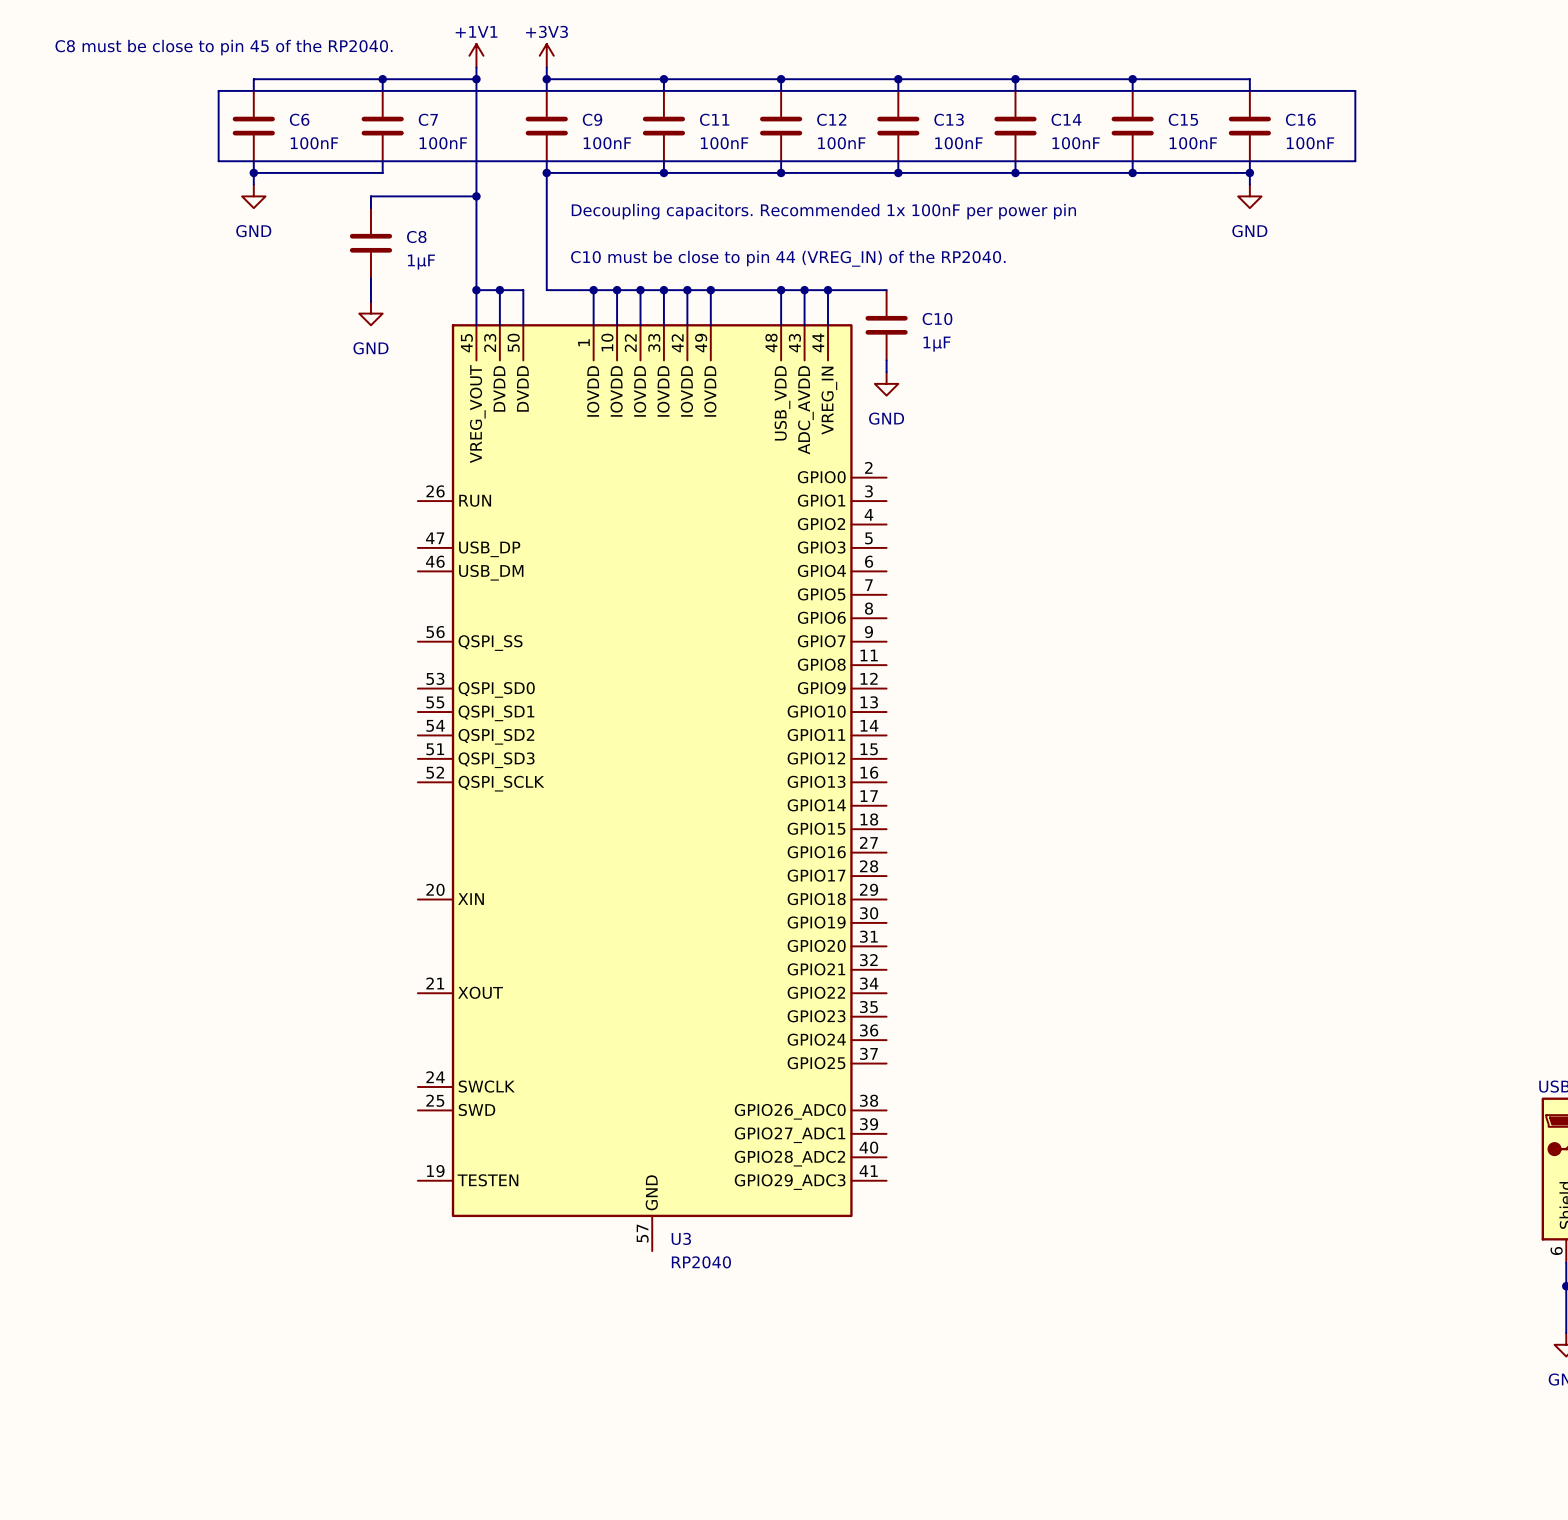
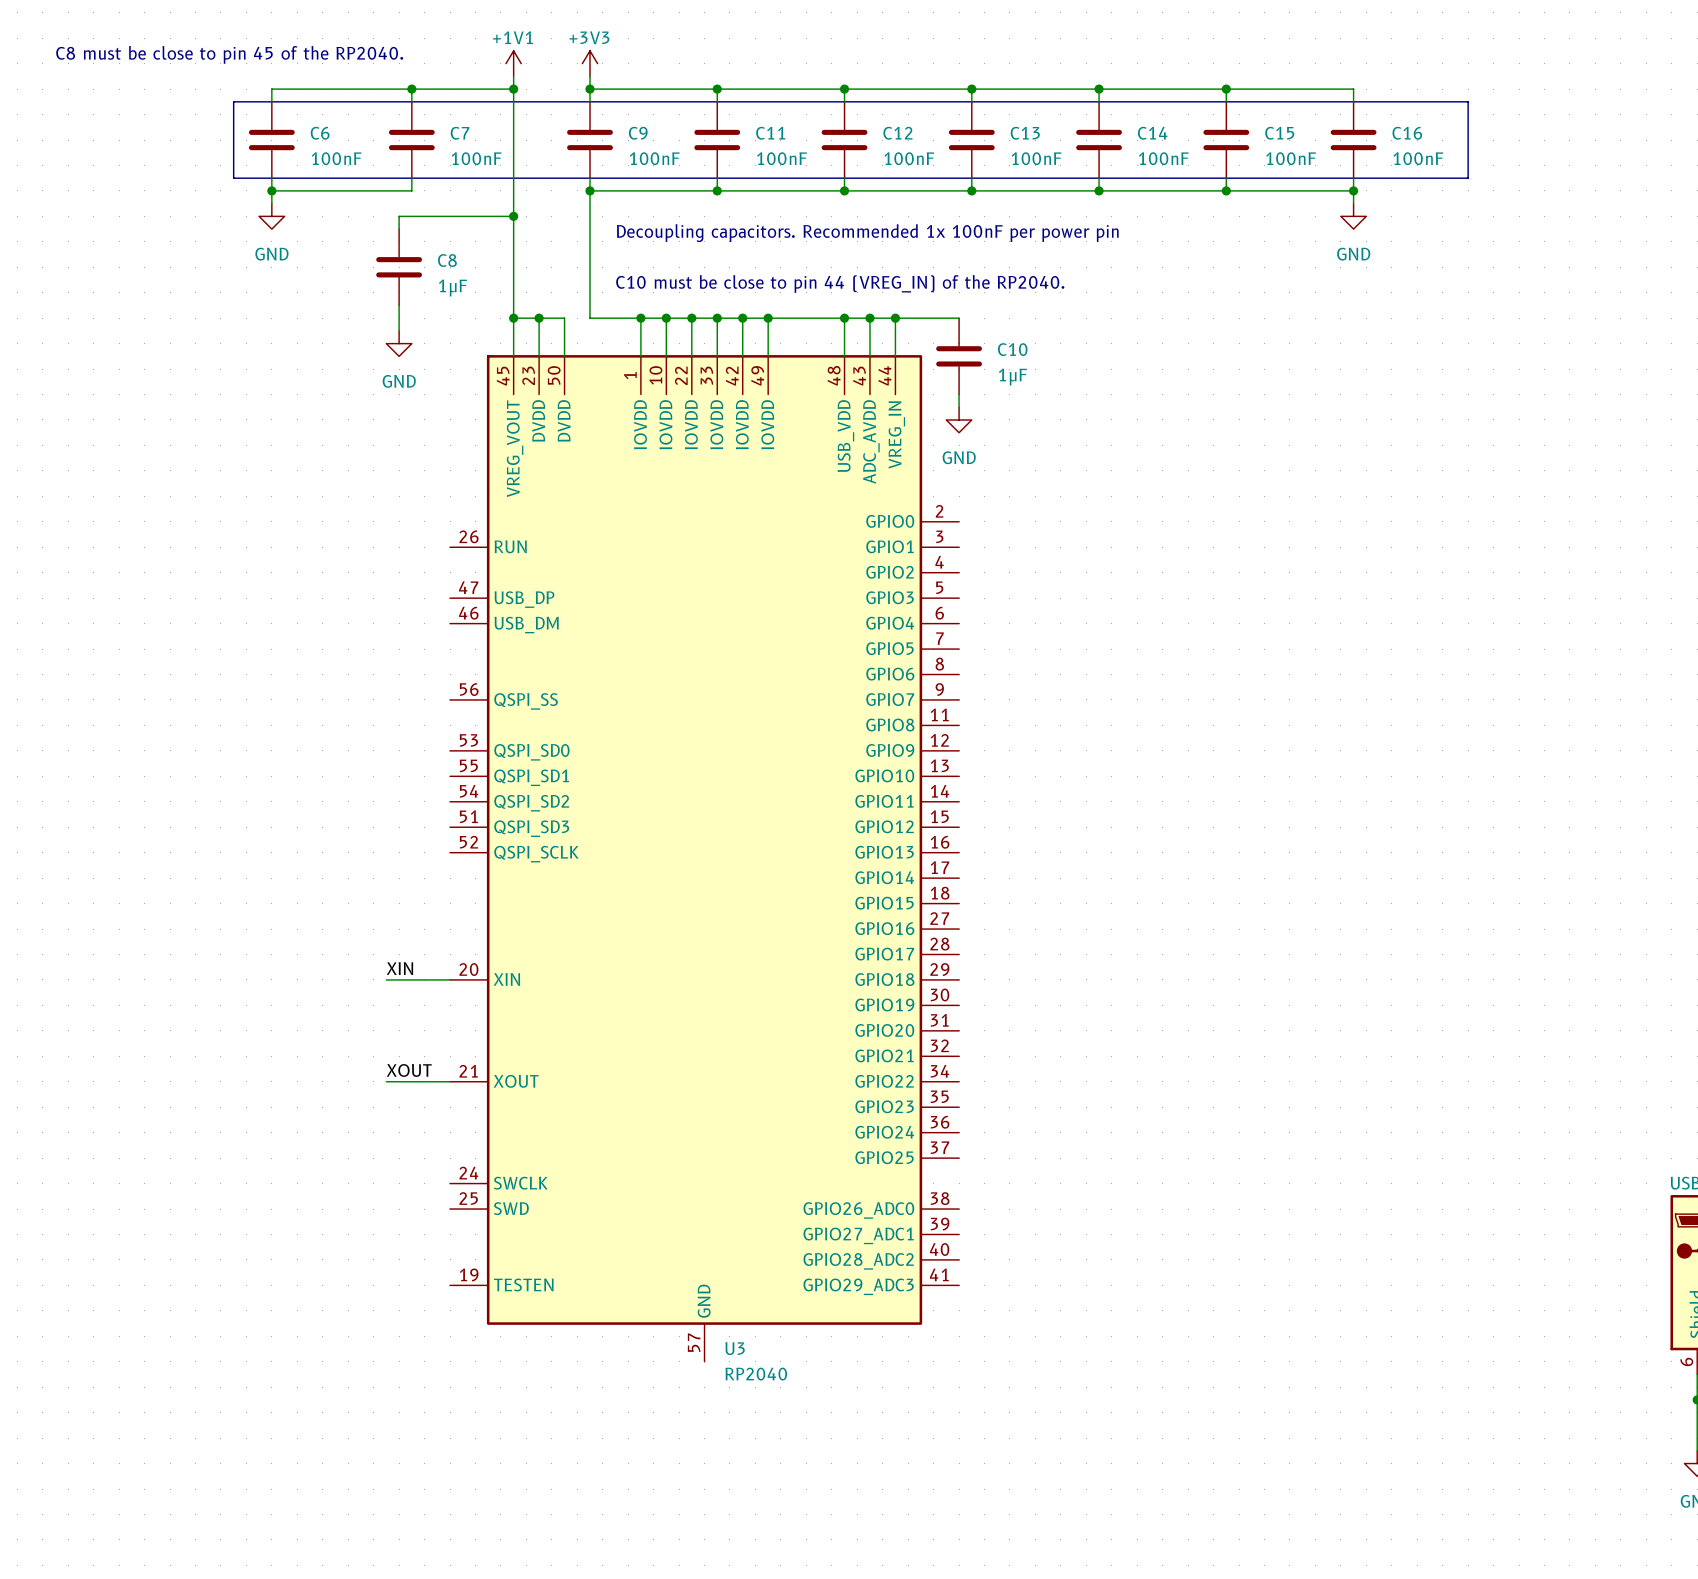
label: none -> XIN (399, 968)
wire: none -> (386, 979) (450, 979)
label: none -> XOUT (409, 1070)
wire: none -> (386, 1081) (450, 1081)

